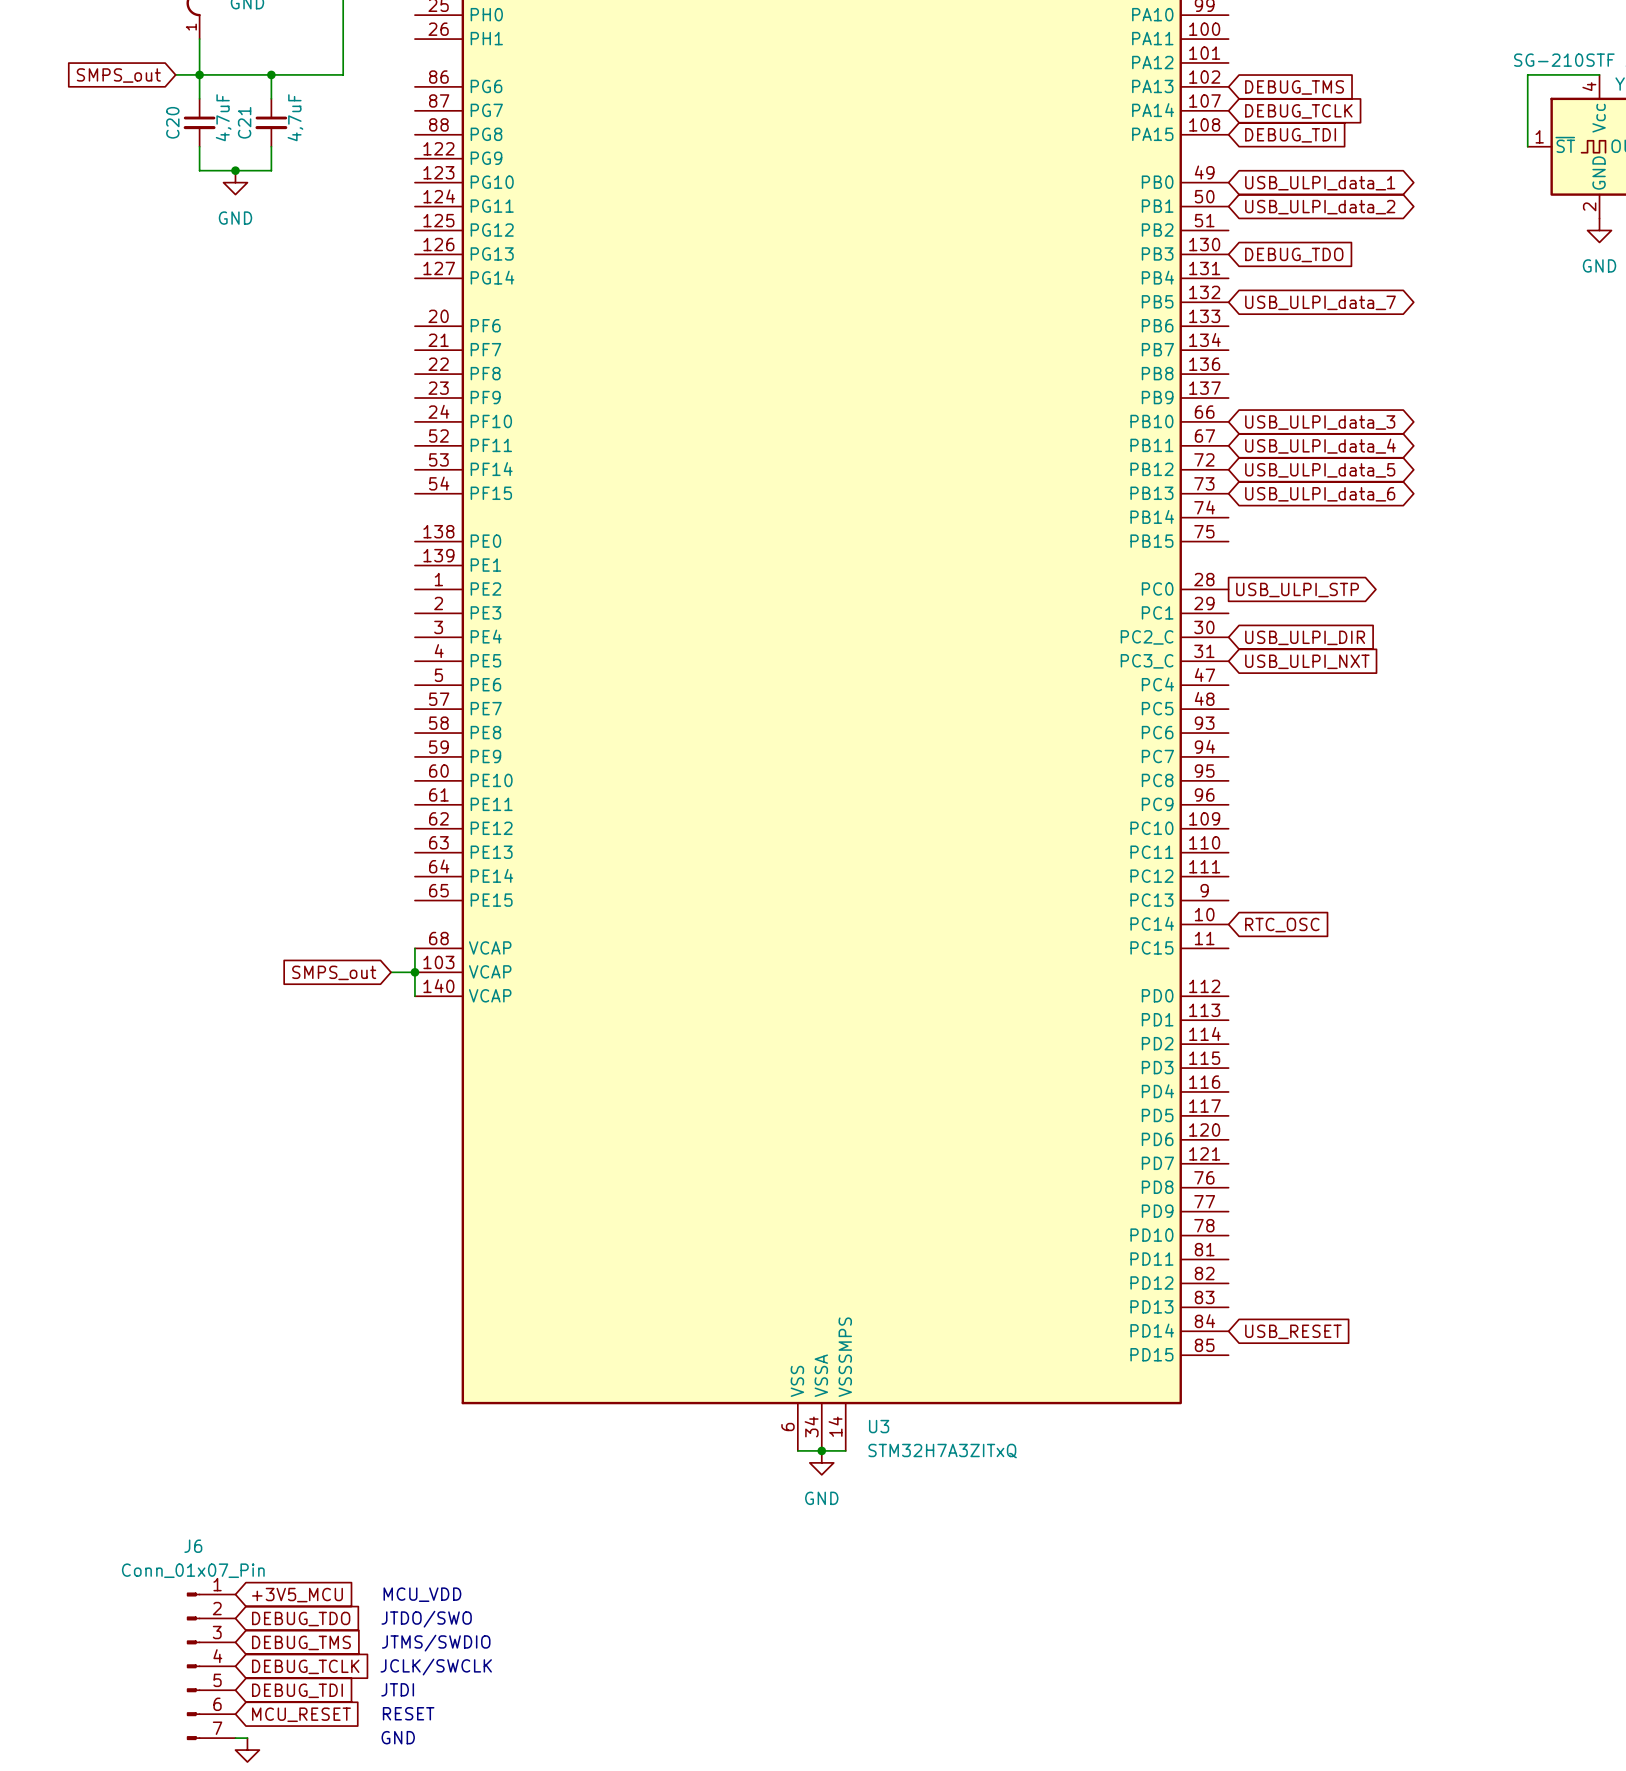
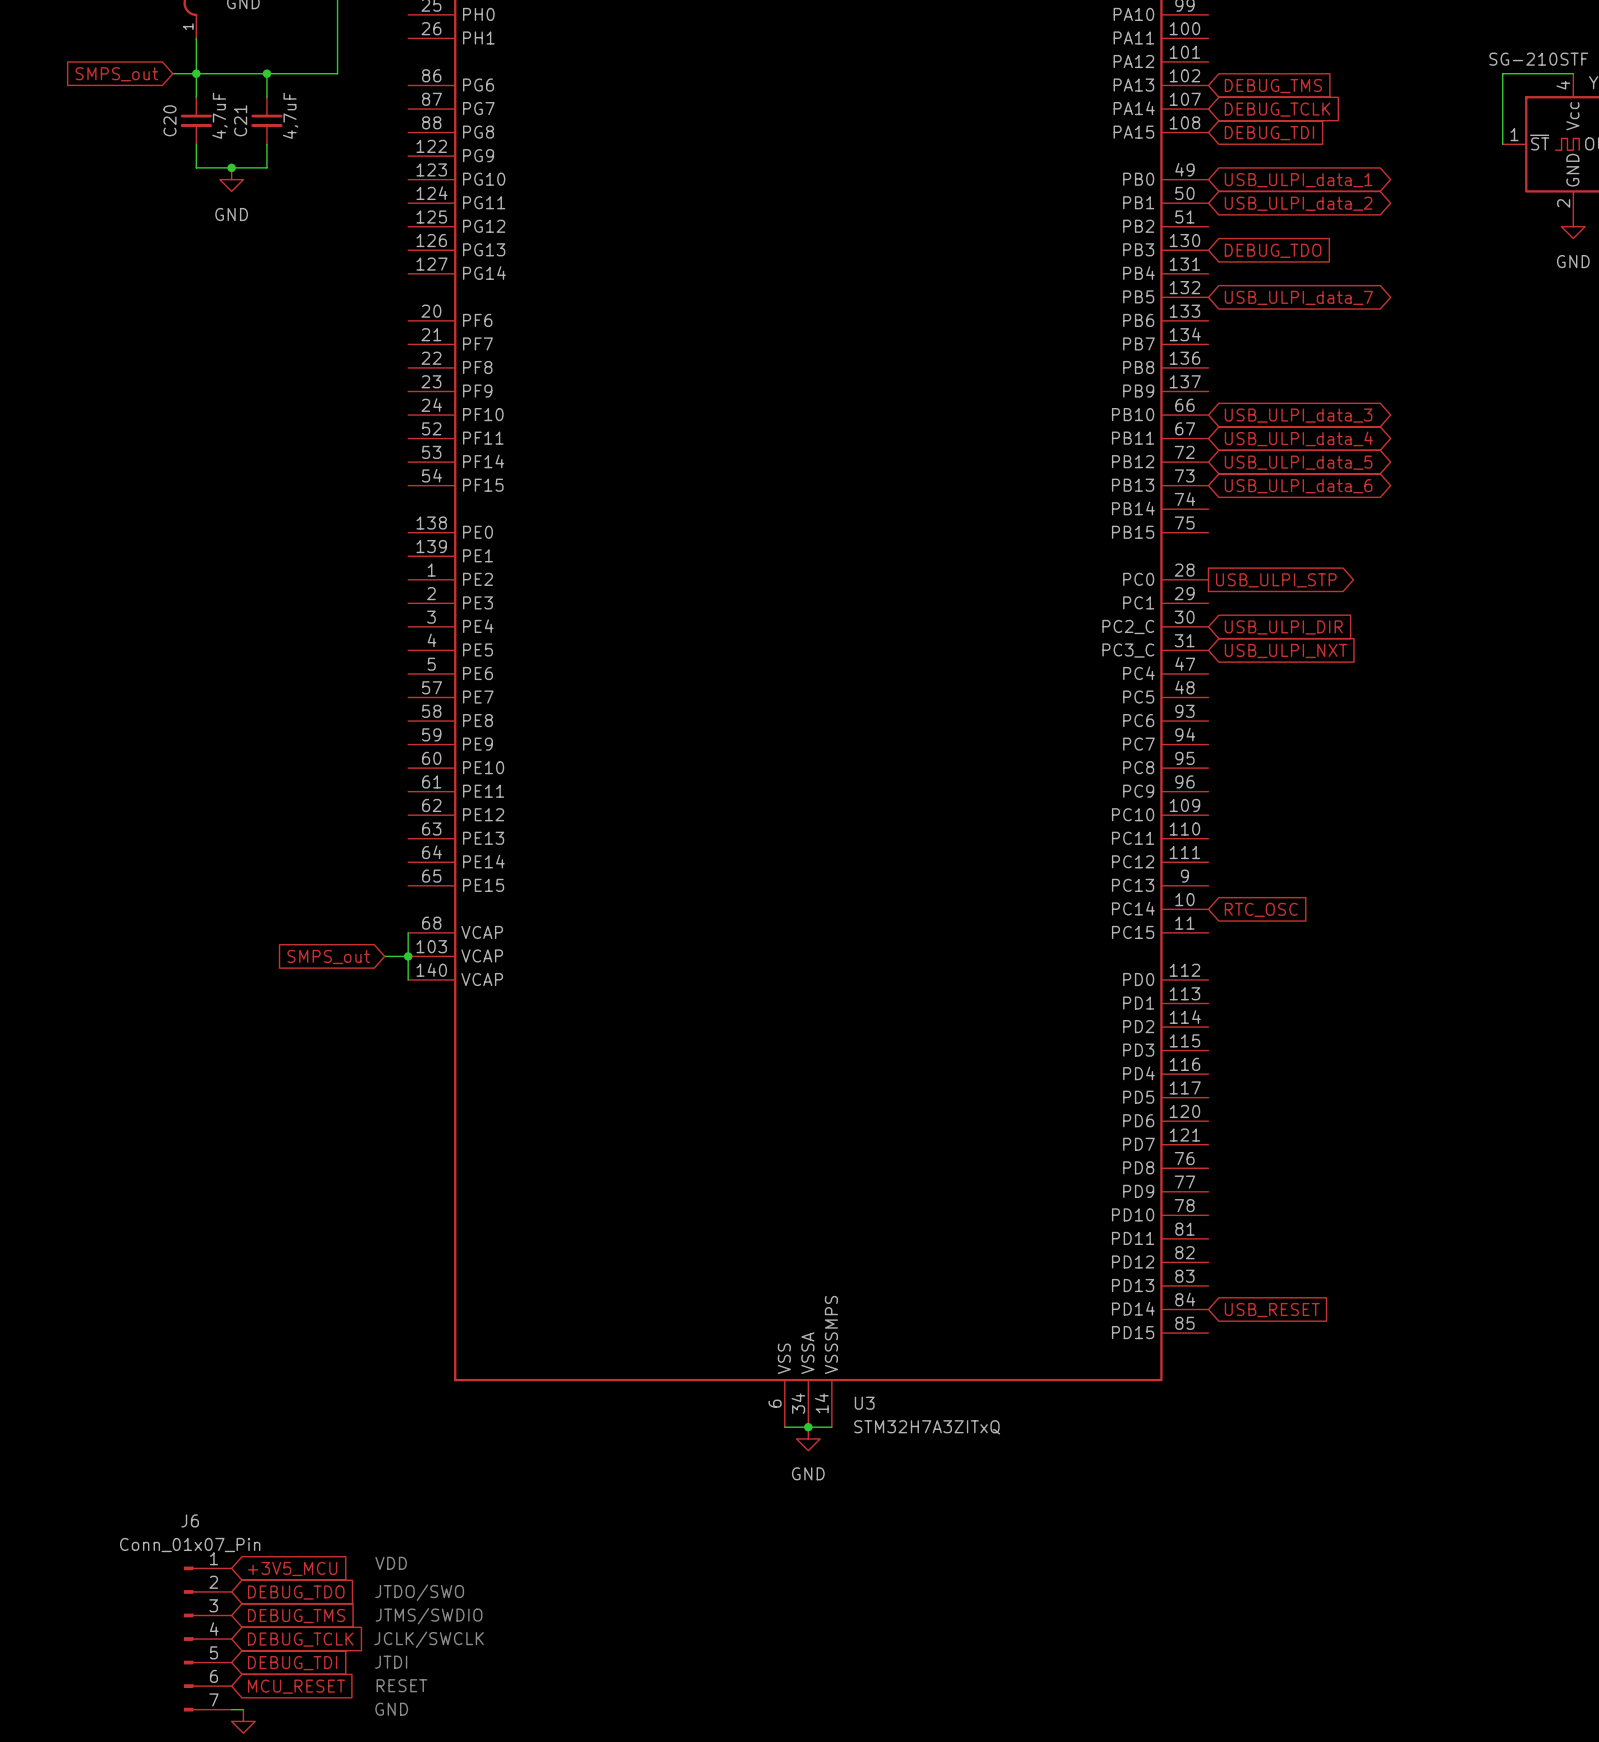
text: none -> VDD (391, 1563)
text: MCU_VDD (422, 1594) -> none

